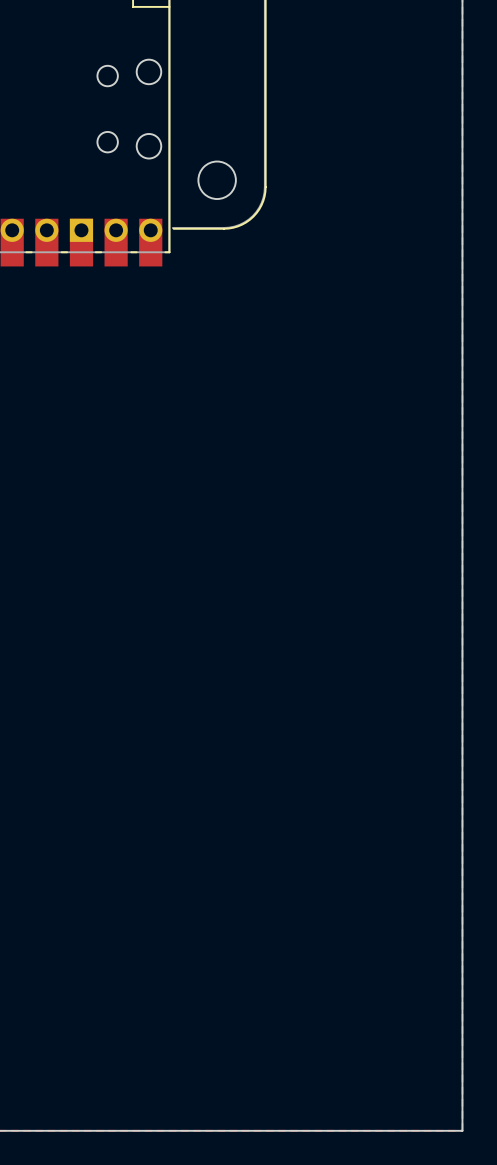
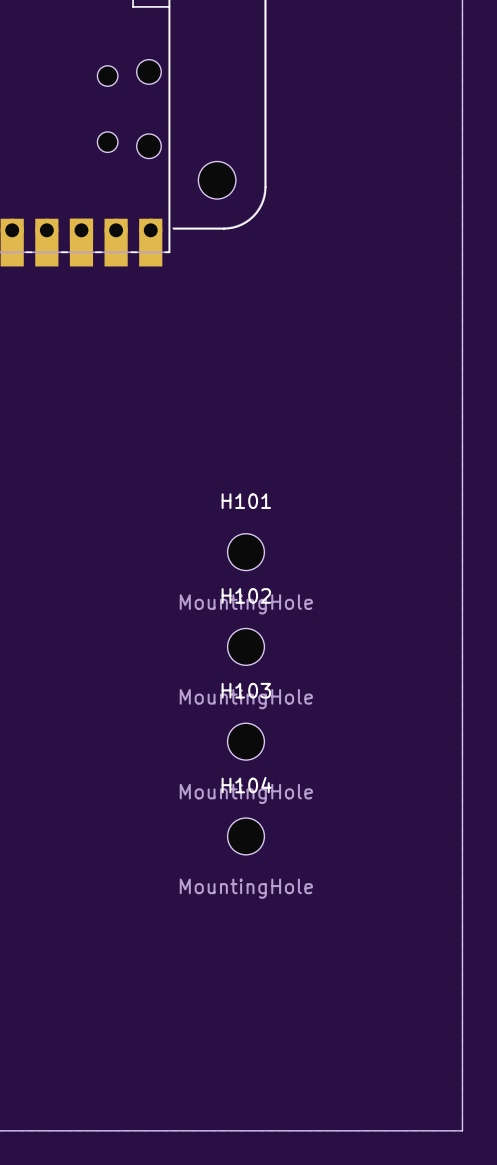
H101: none -> MountingHole (245, 552)
H102: none -> MountingHole (245, 646)
H103: none -> MountingHole (245, 741)
H104: none -> MountingHole (245, 836)

